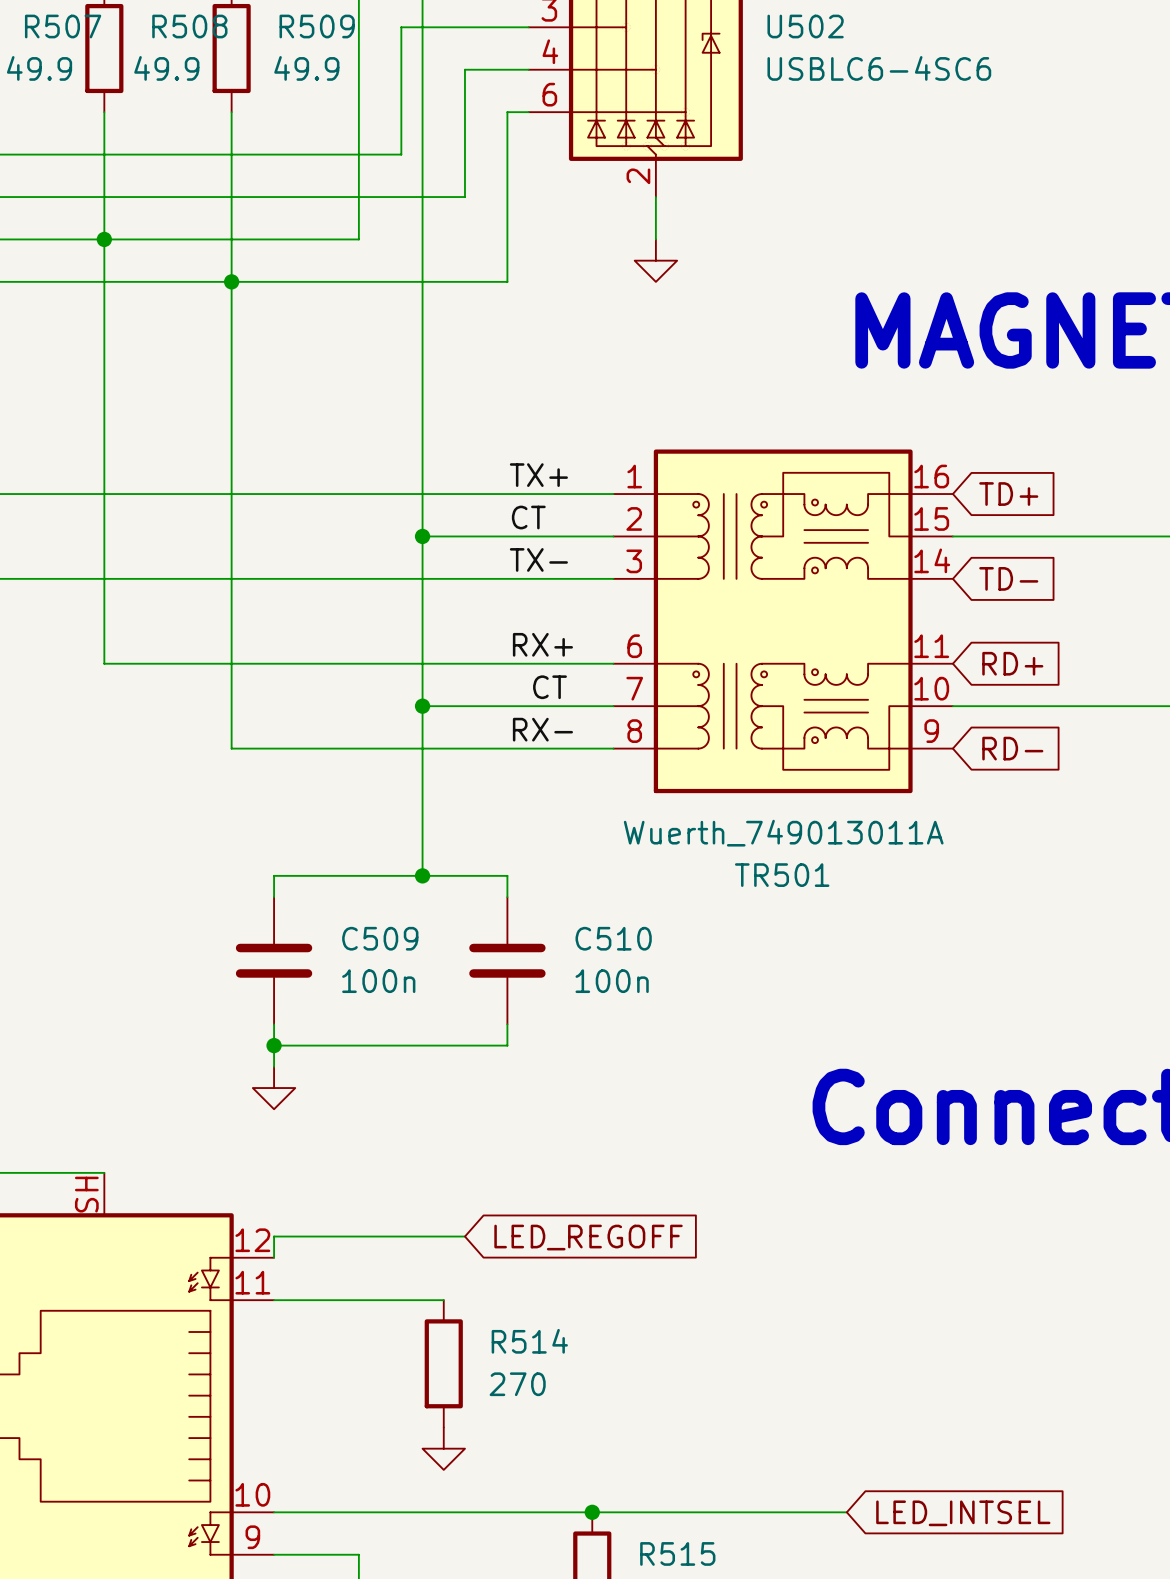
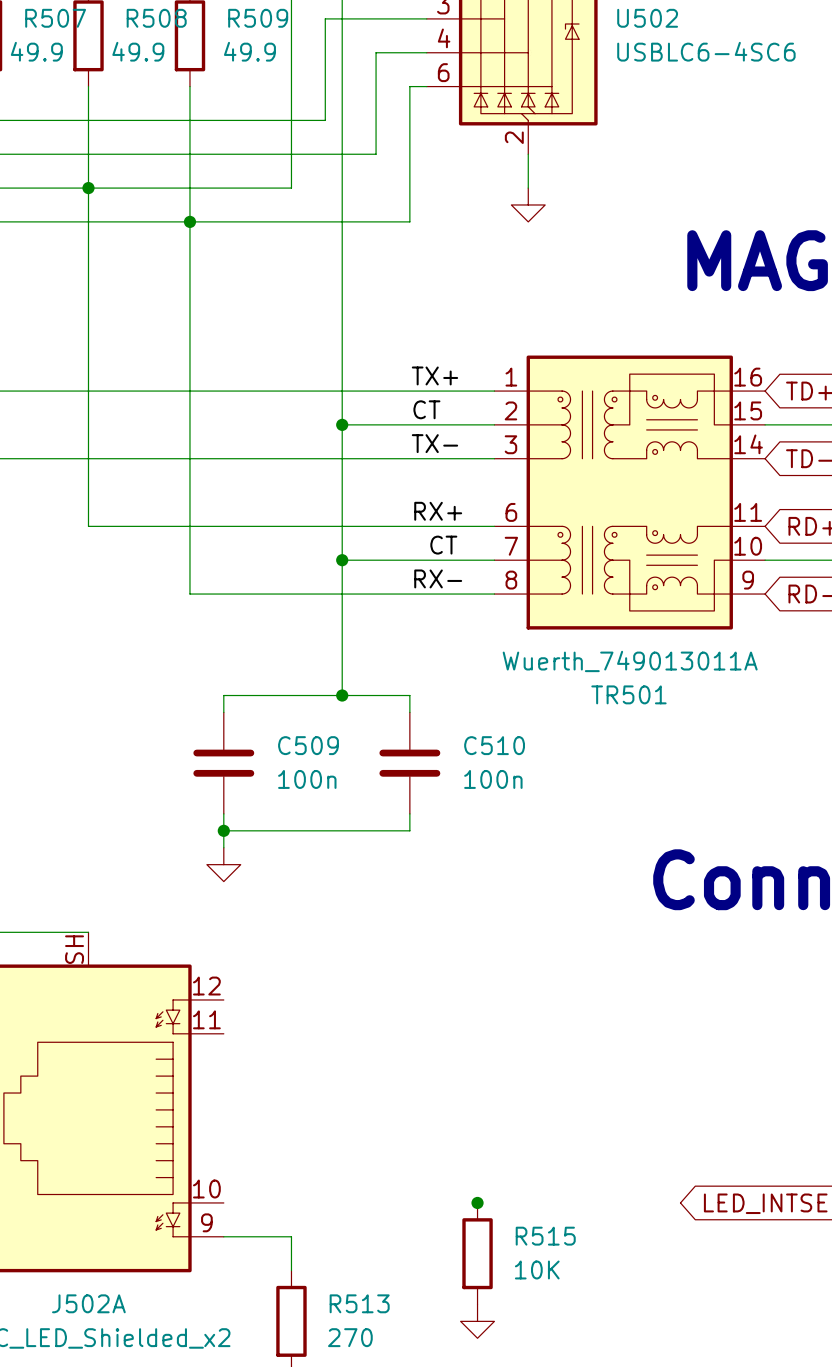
wire: (464, 1236) (274, 1236) (274, 1257) -> none
global label: LED_REGOFF (588, 1237) -> none
wire: (274, 1300) (443, 1300) -> none
R514: 270 (443, 1363) -> none
power symbol: (443, 1448) -> none
wire: (274, 1512) (846, 1512) -> none

